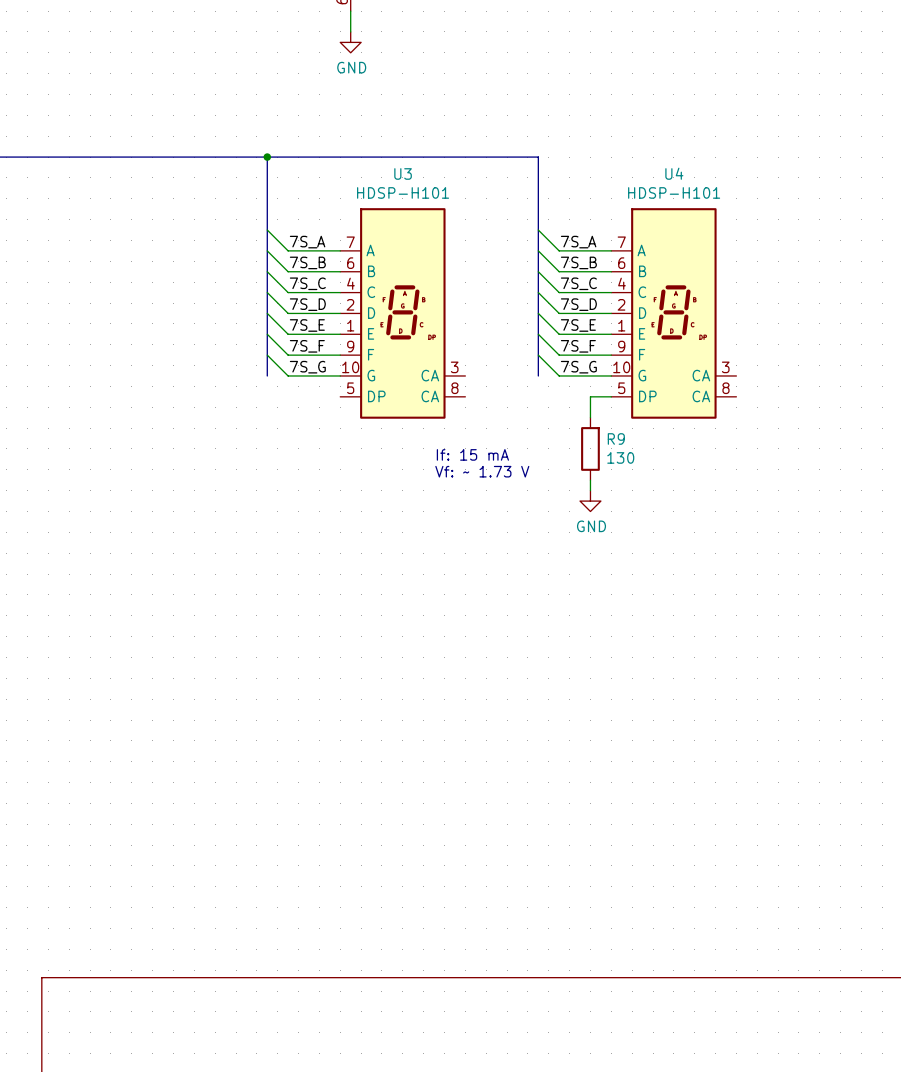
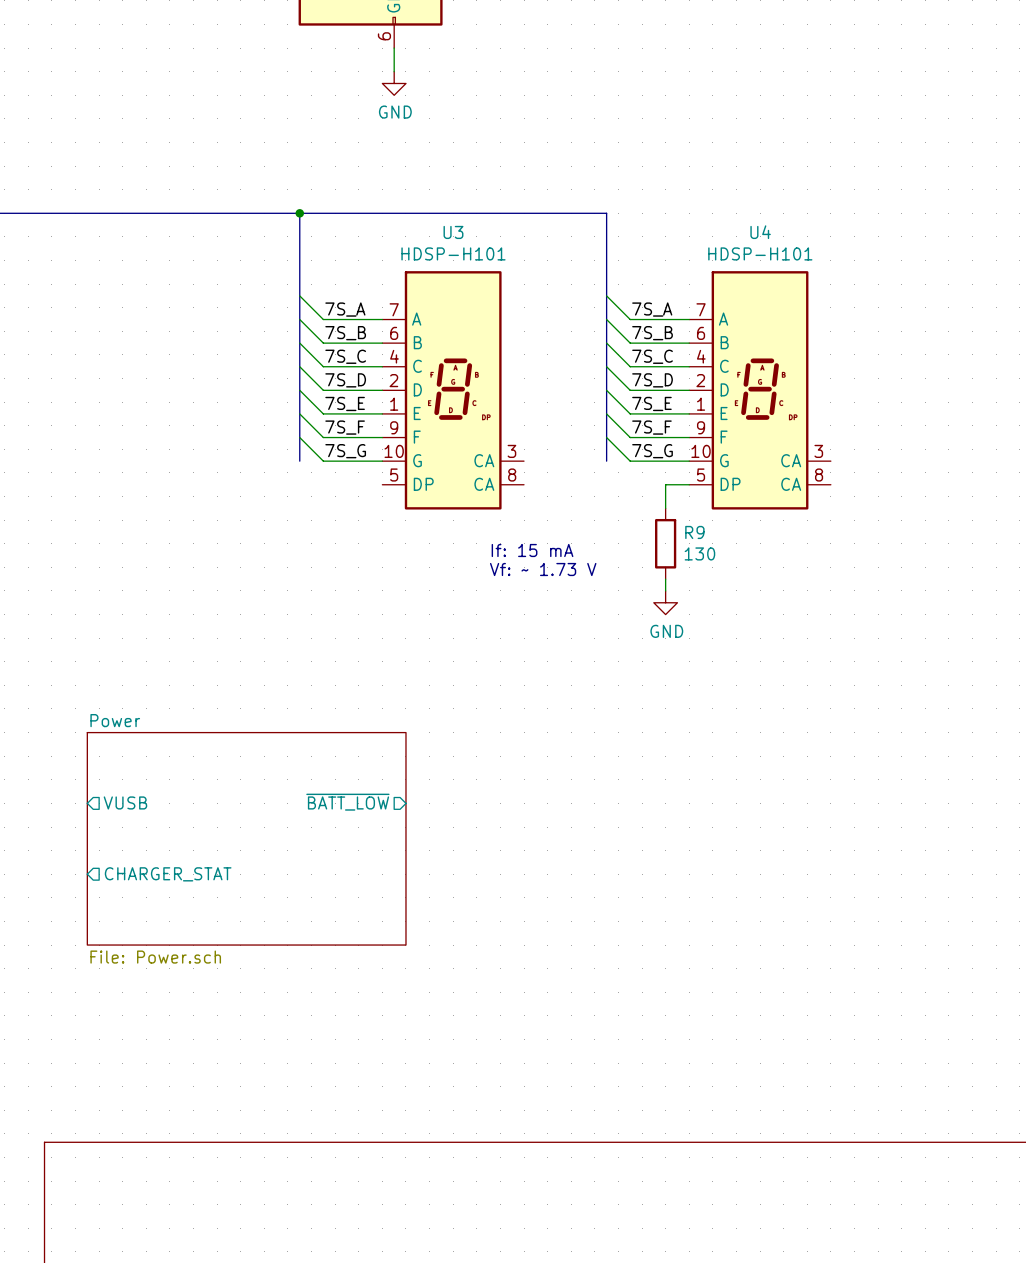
sheet pin: none -> VUSB (125, 802)
sheet pin: none -> ~{BATT_LOW} (347, 802)
sheet Power: none -> File: Power.sch (246, 838)
sheet pin: none -> CHARGER_STAT (168, 874)

